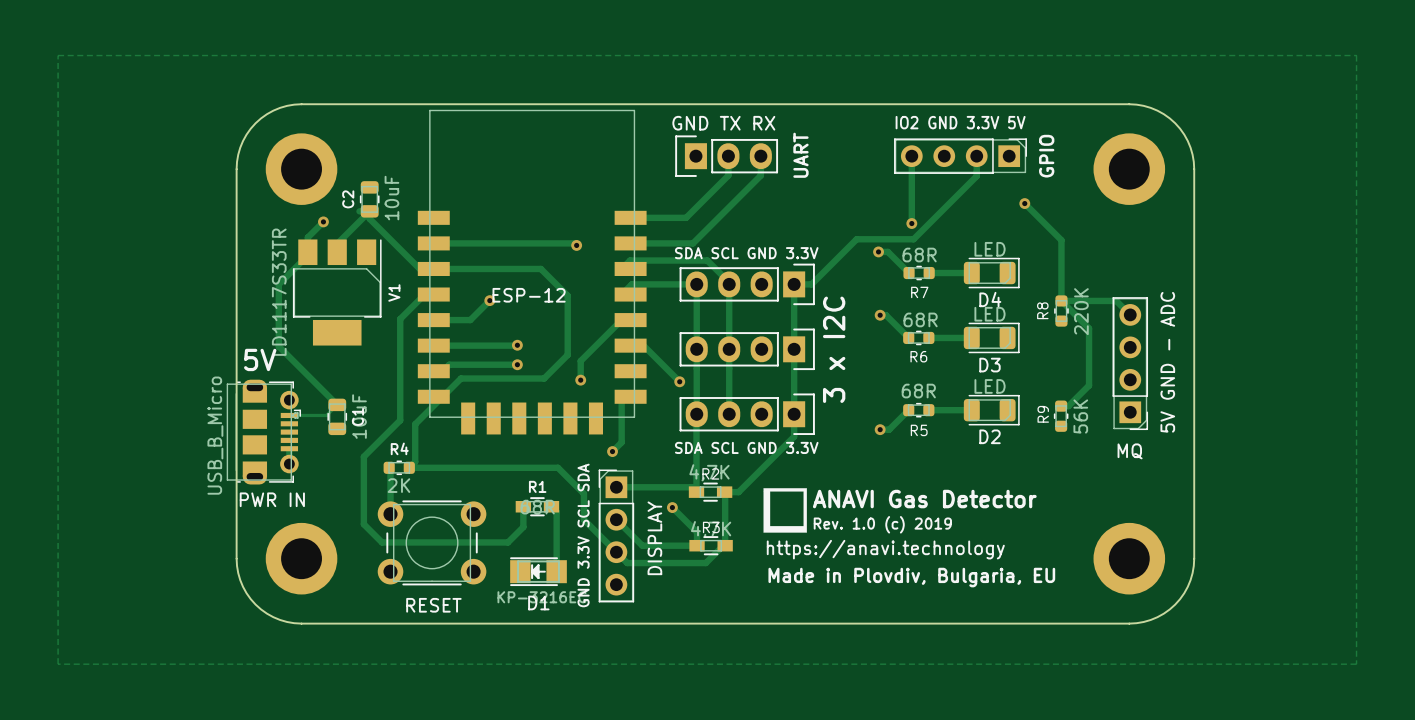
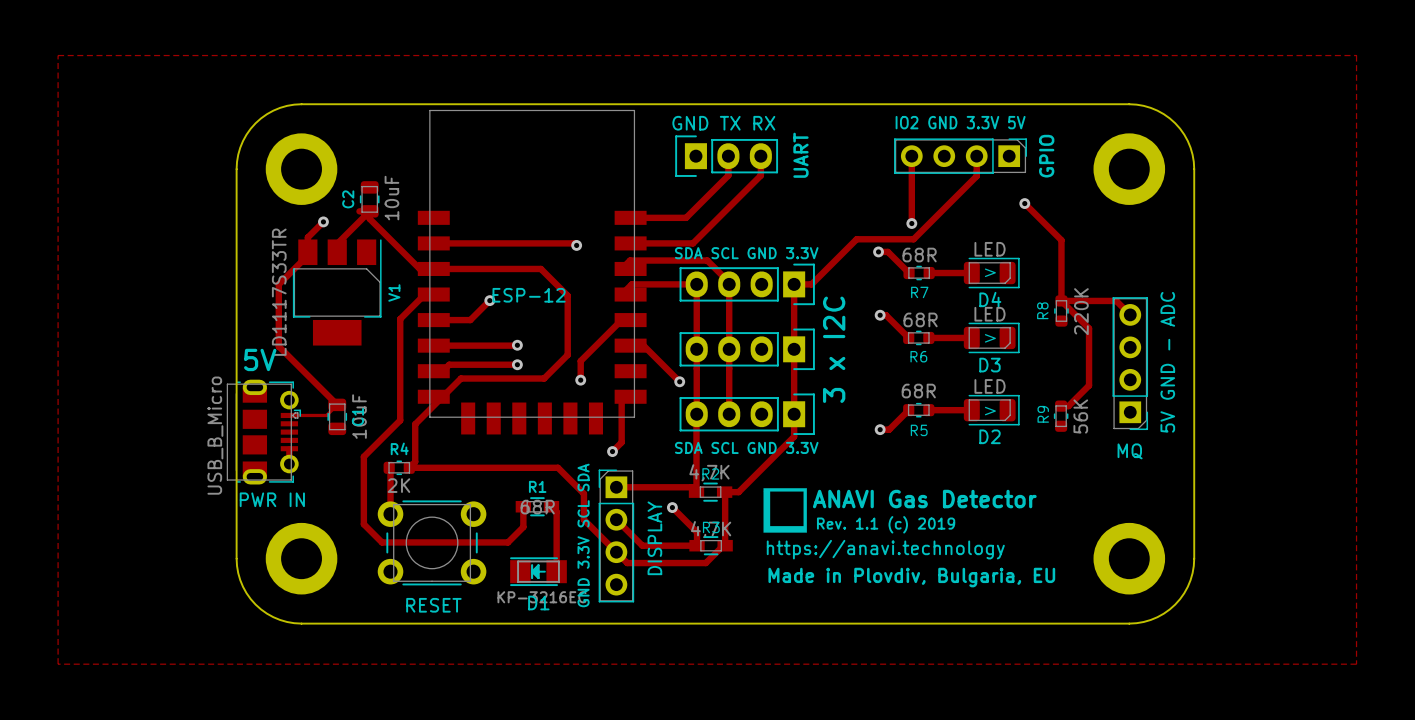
text: none -> > (990, 272)
text: none -> > (990, 338)
text: none -> > (990, 411)
text: Rev. 1.0 (c) 2019 (882, 524) -> Rev. 1.1 (c) 2019 (886, 524)

